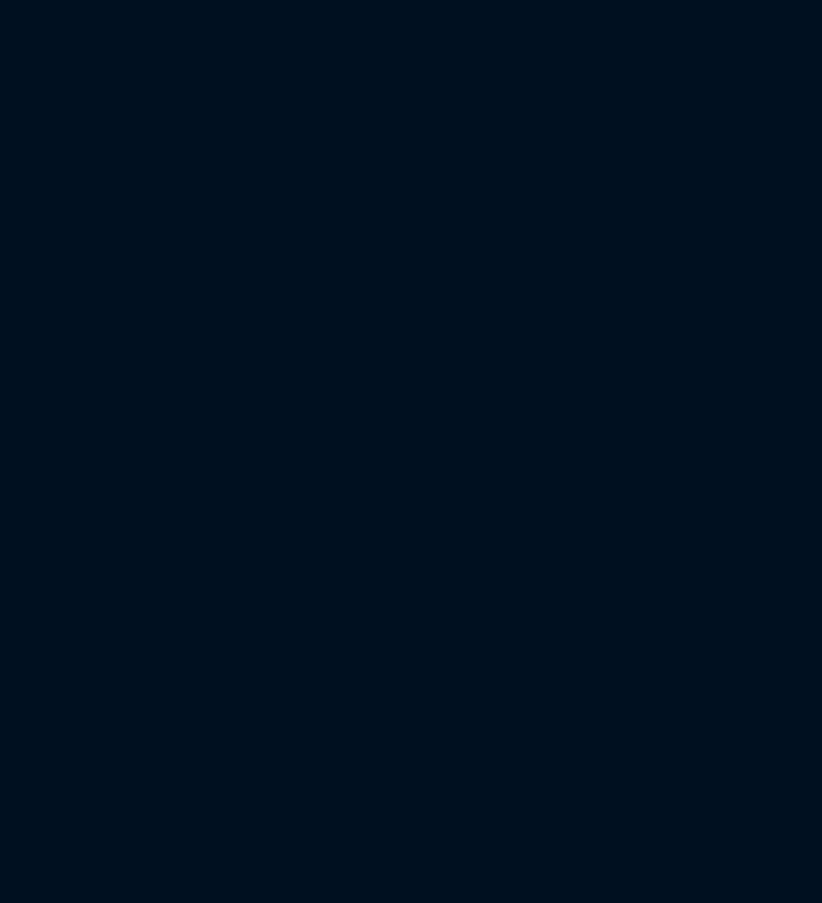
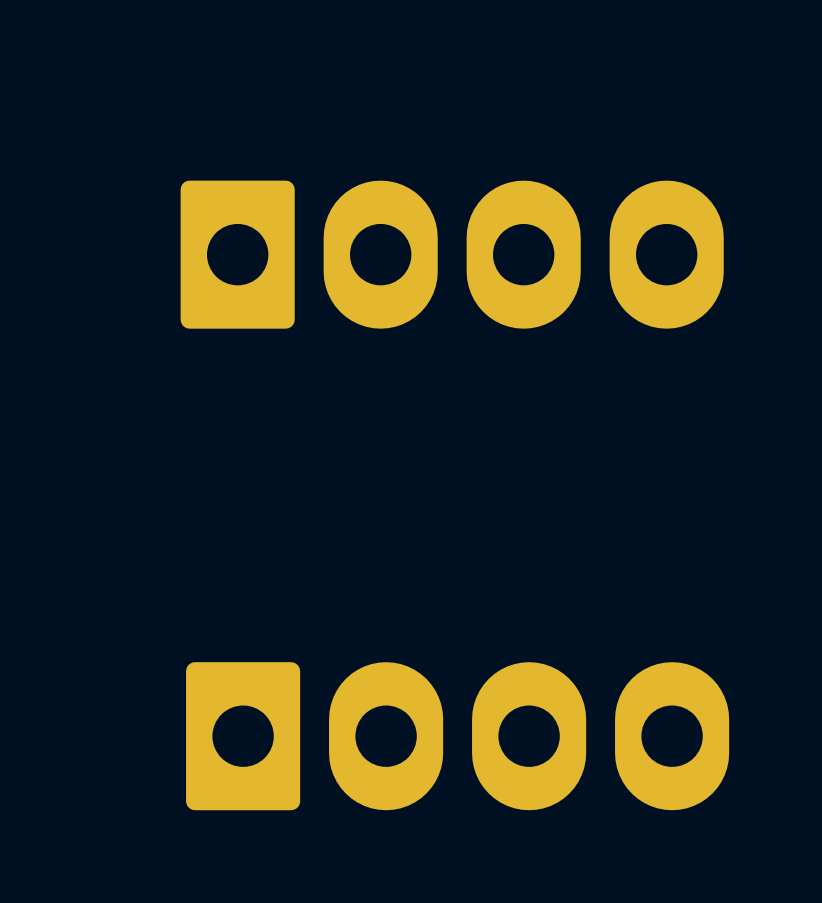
part: none -> (452, 254)
part: none -> (457, 736)

